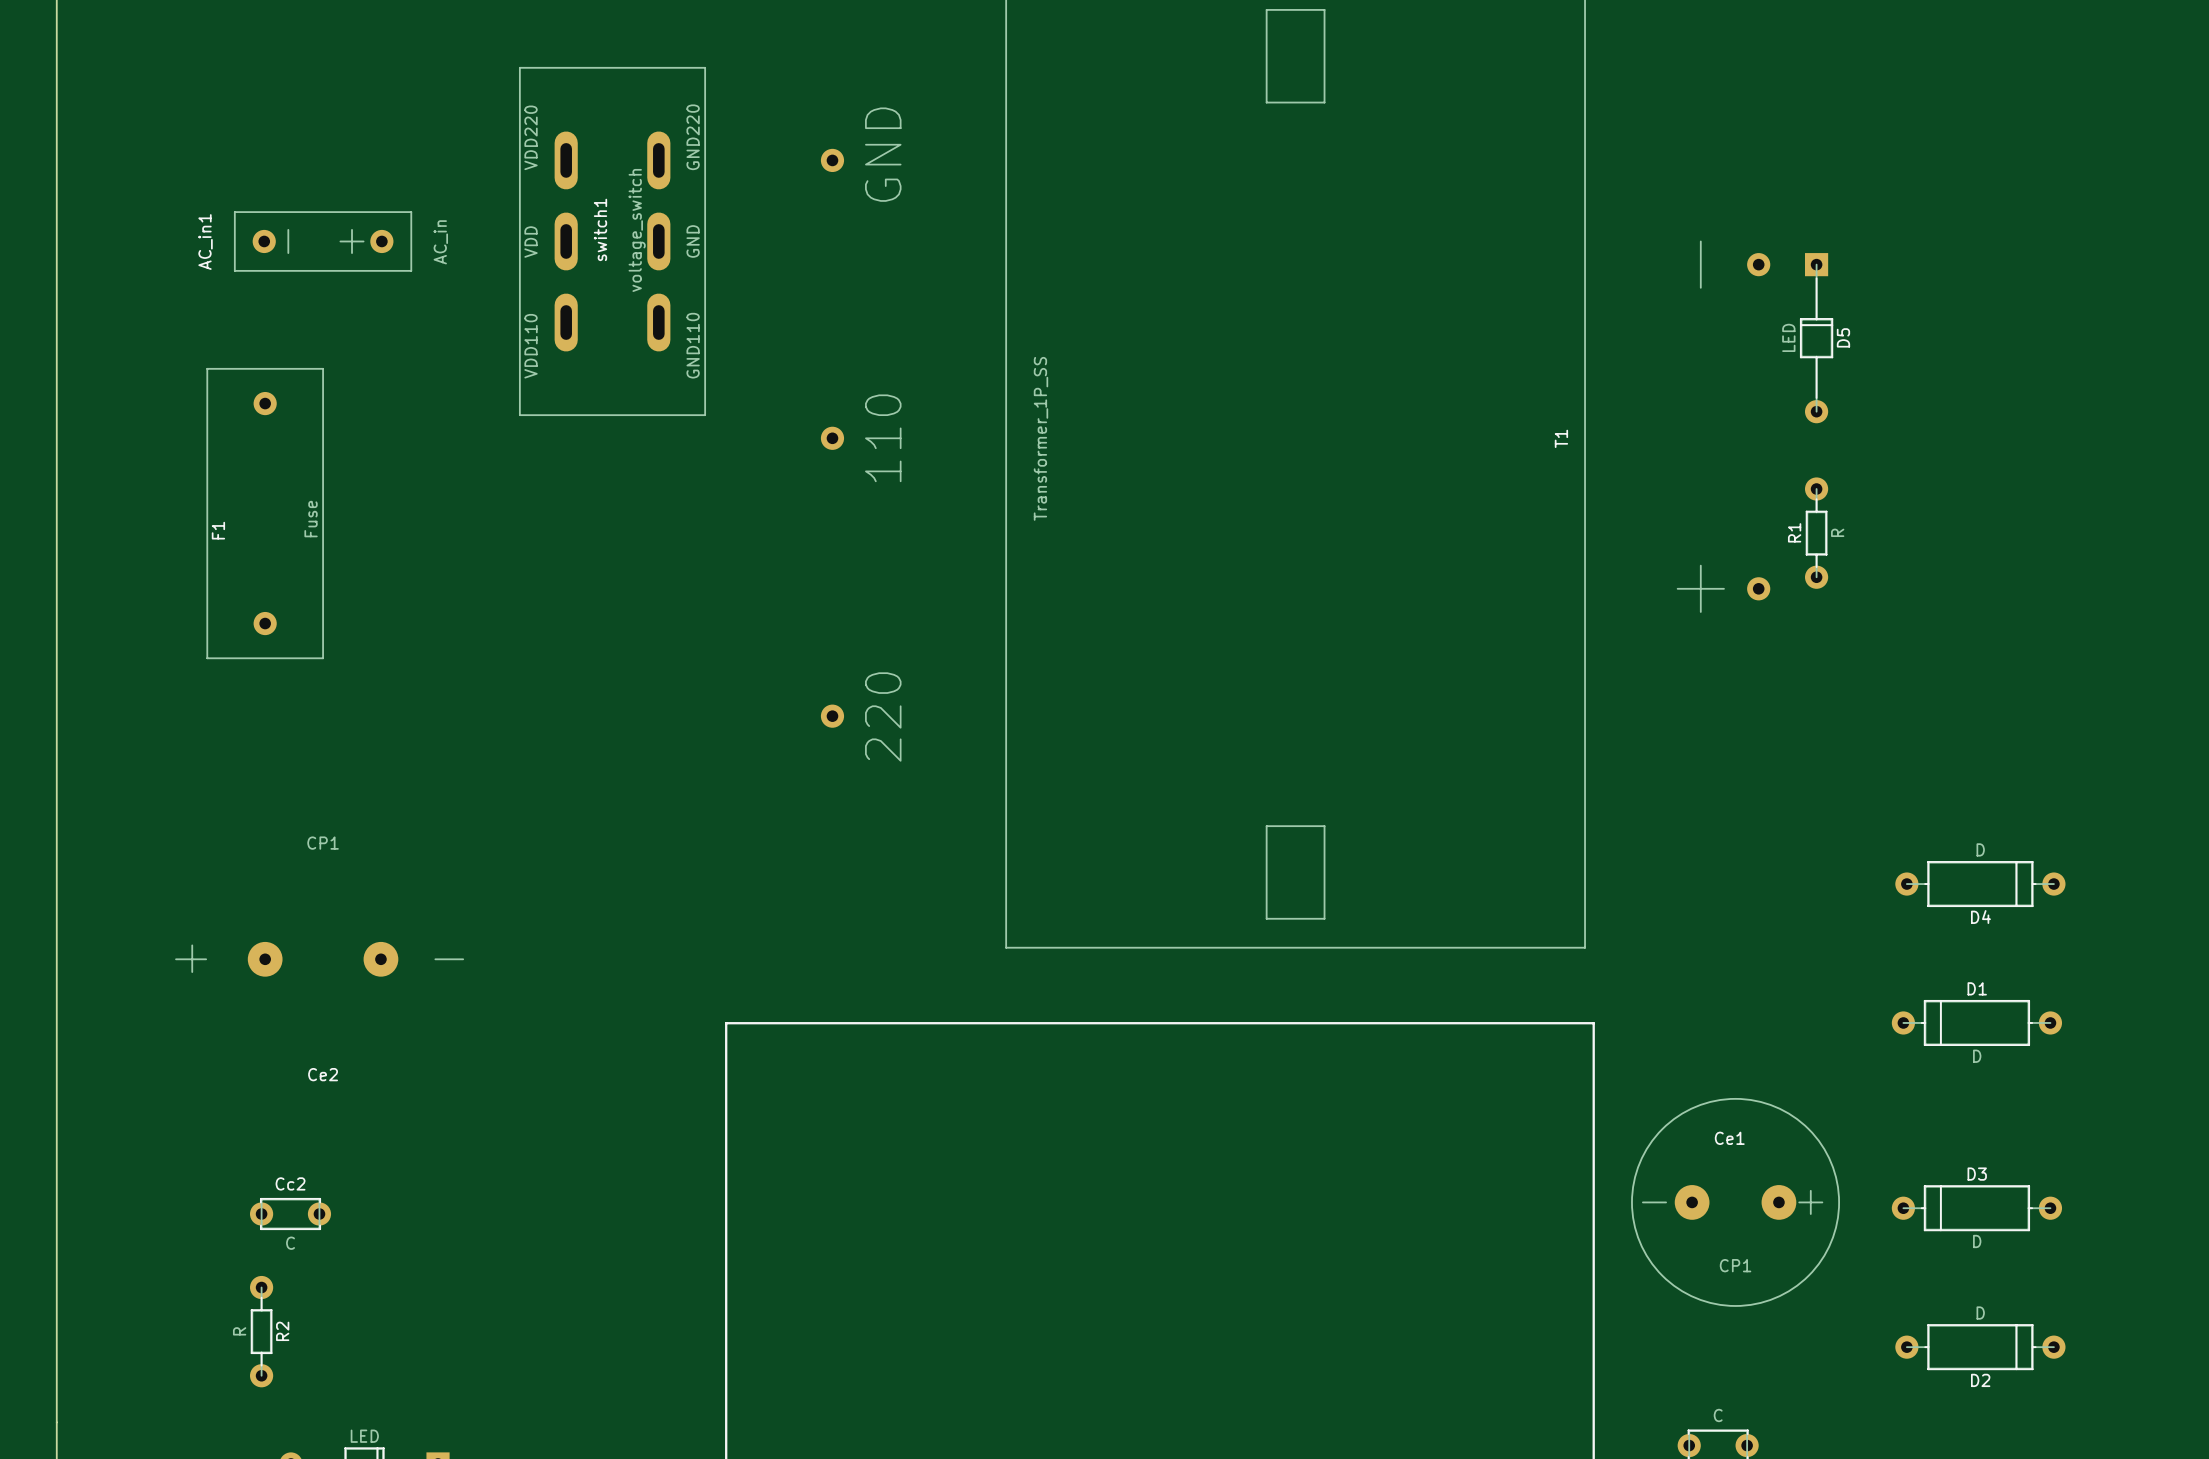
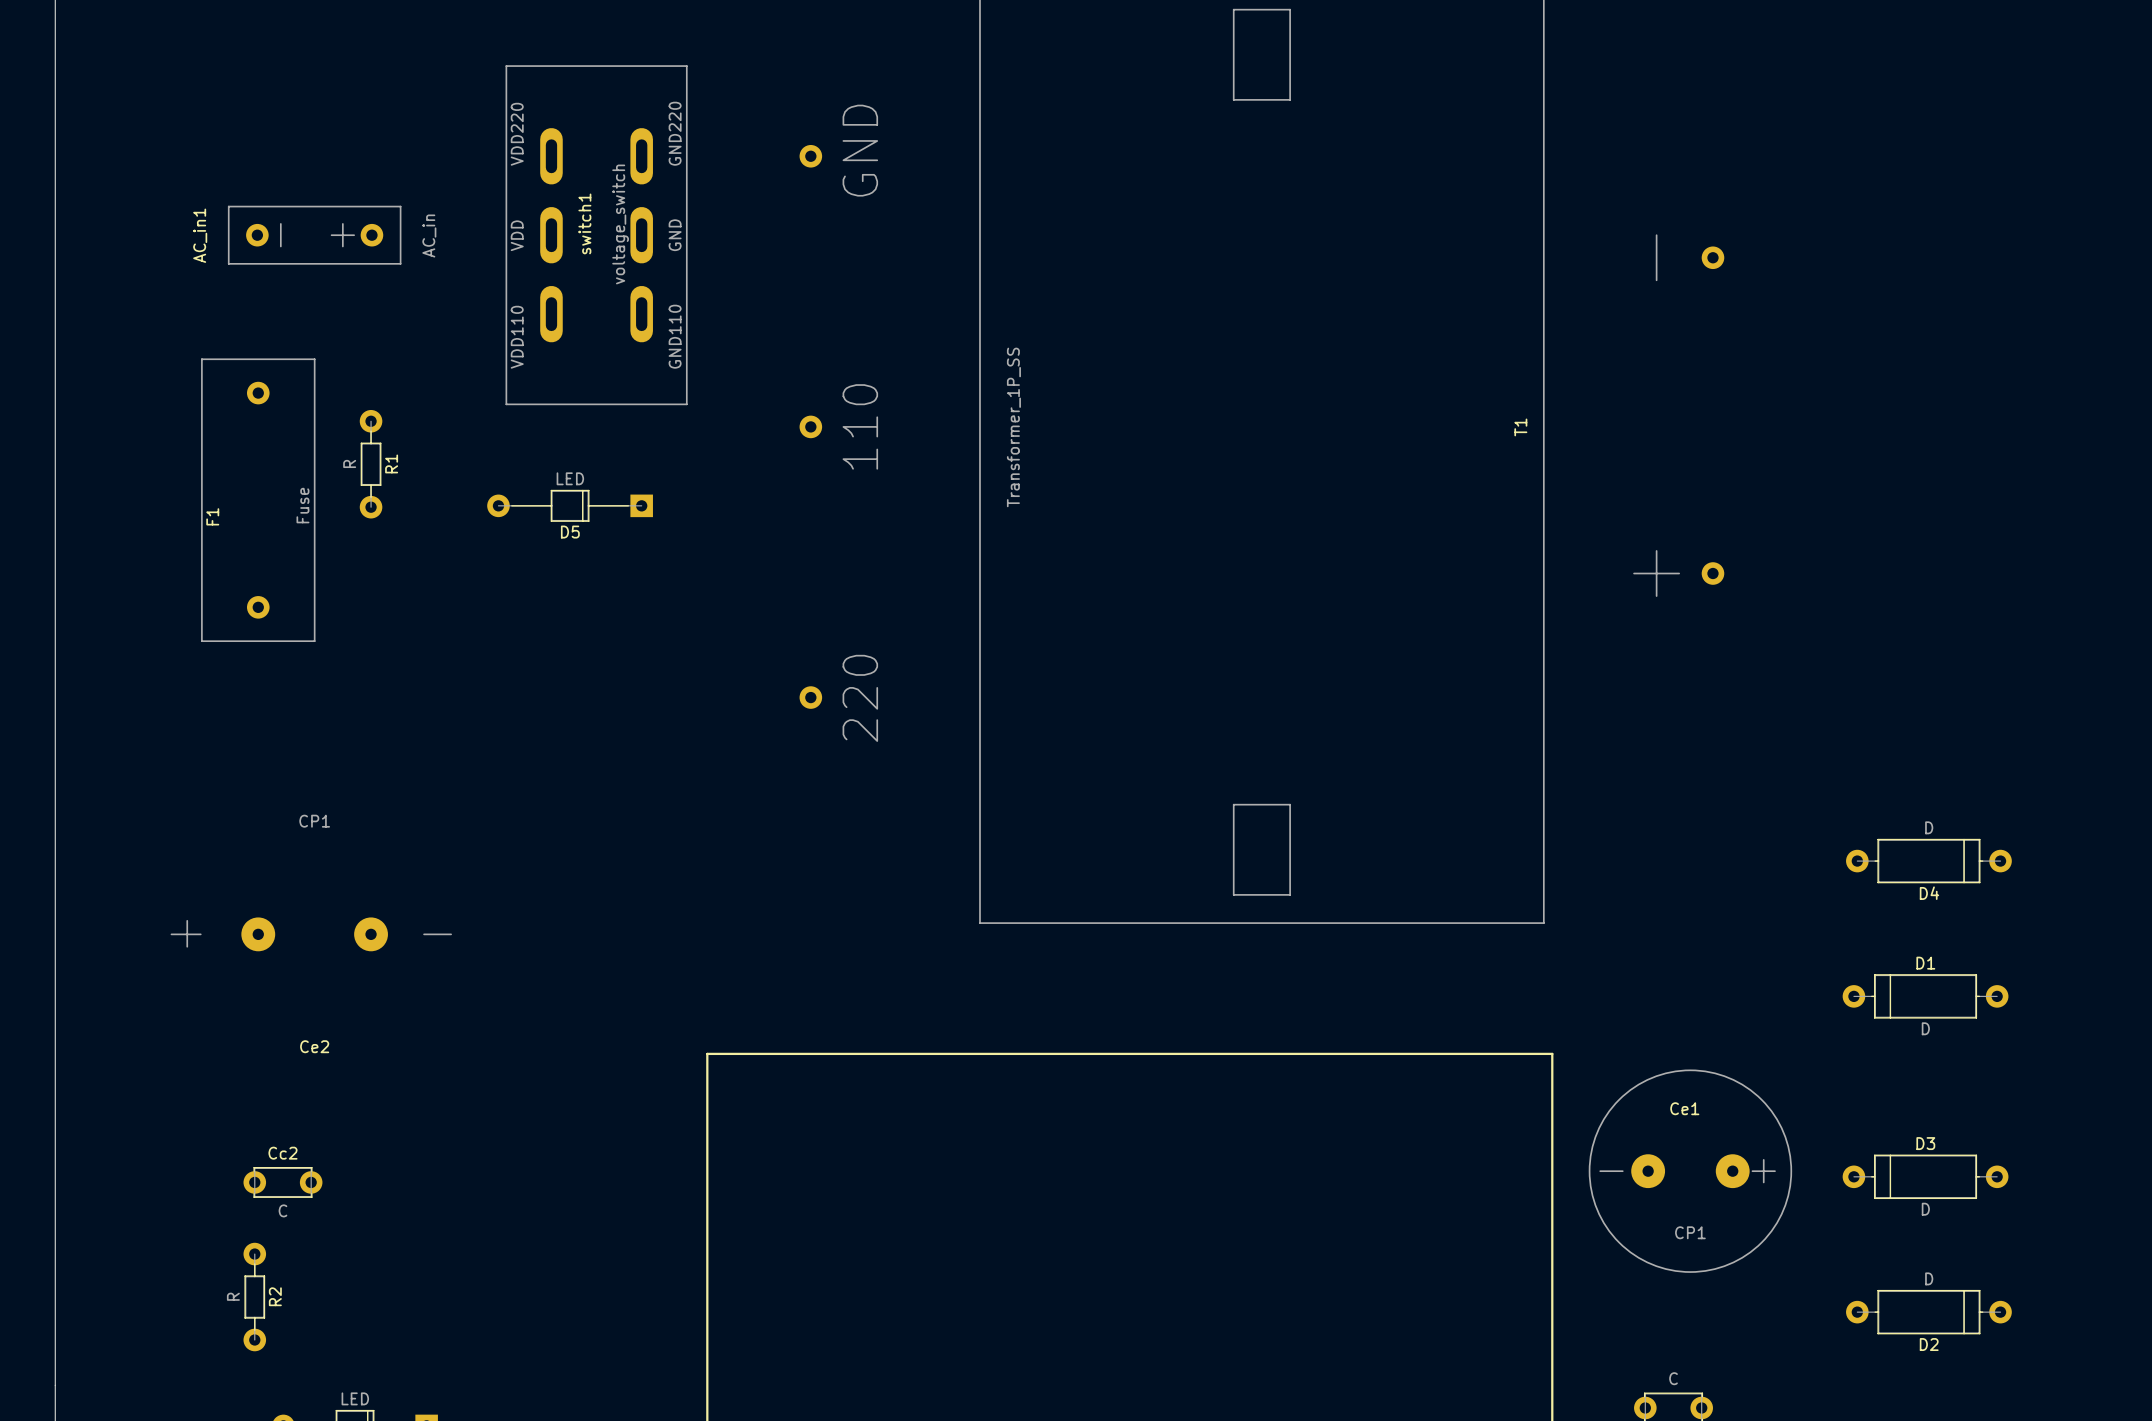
D5 rotation: 0° (1816, 338) -> 90° clockwise (570, 505)
D5 position: (1816, 338) -> (570, 505)
R1 name position: R1 (1794, 532) -> R1 (391, 463)
R1 value position: R (1837, 532) -> R (349, 463)
R1 position: (1816, 533) -> (371, 464)
line: (726, 1082) (726, 1023) (1593, 1023) (1593, 1082) -> (707, 1053) (1552, 1053)

